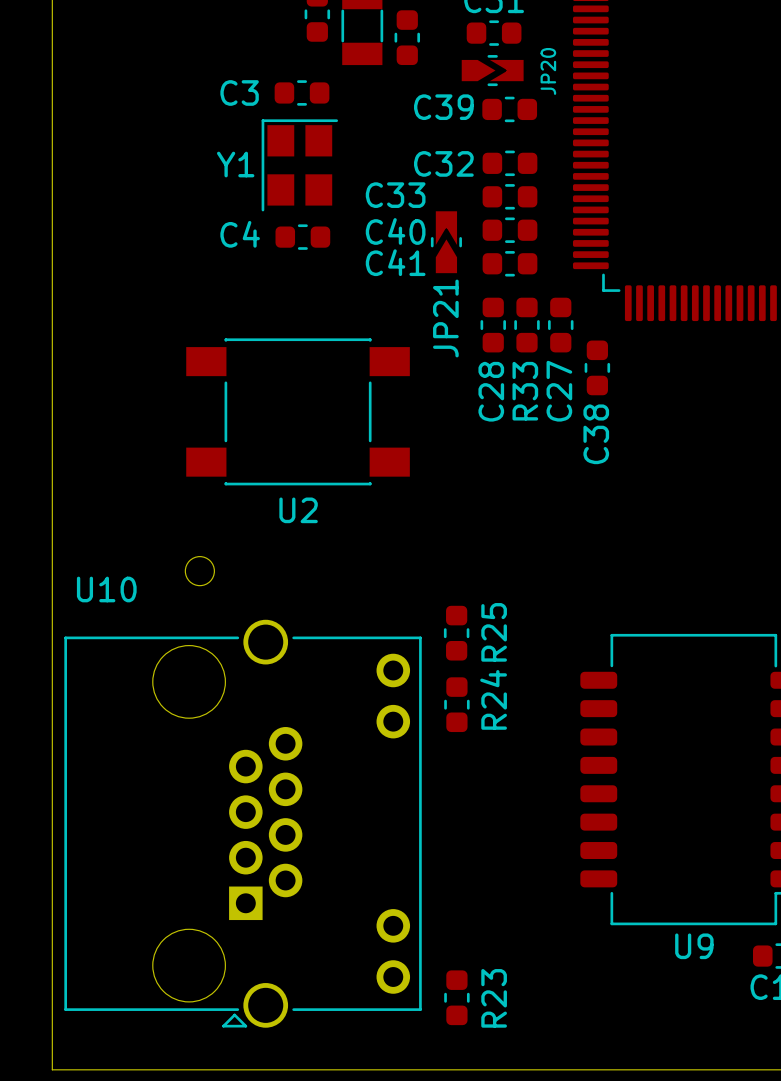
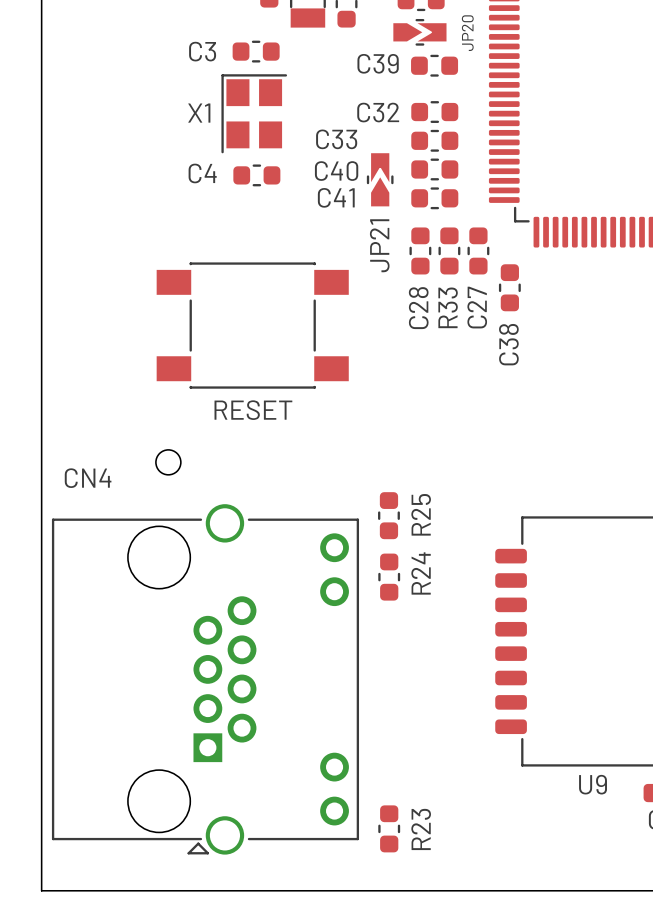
Y1 name: Y1 (235, 164) -> X1 (199, 113)
U2 name: U2 (298, 510) -> RESET (253, 410)
U10 name: U10 (106, 589) -> CN4 (88, 478)

